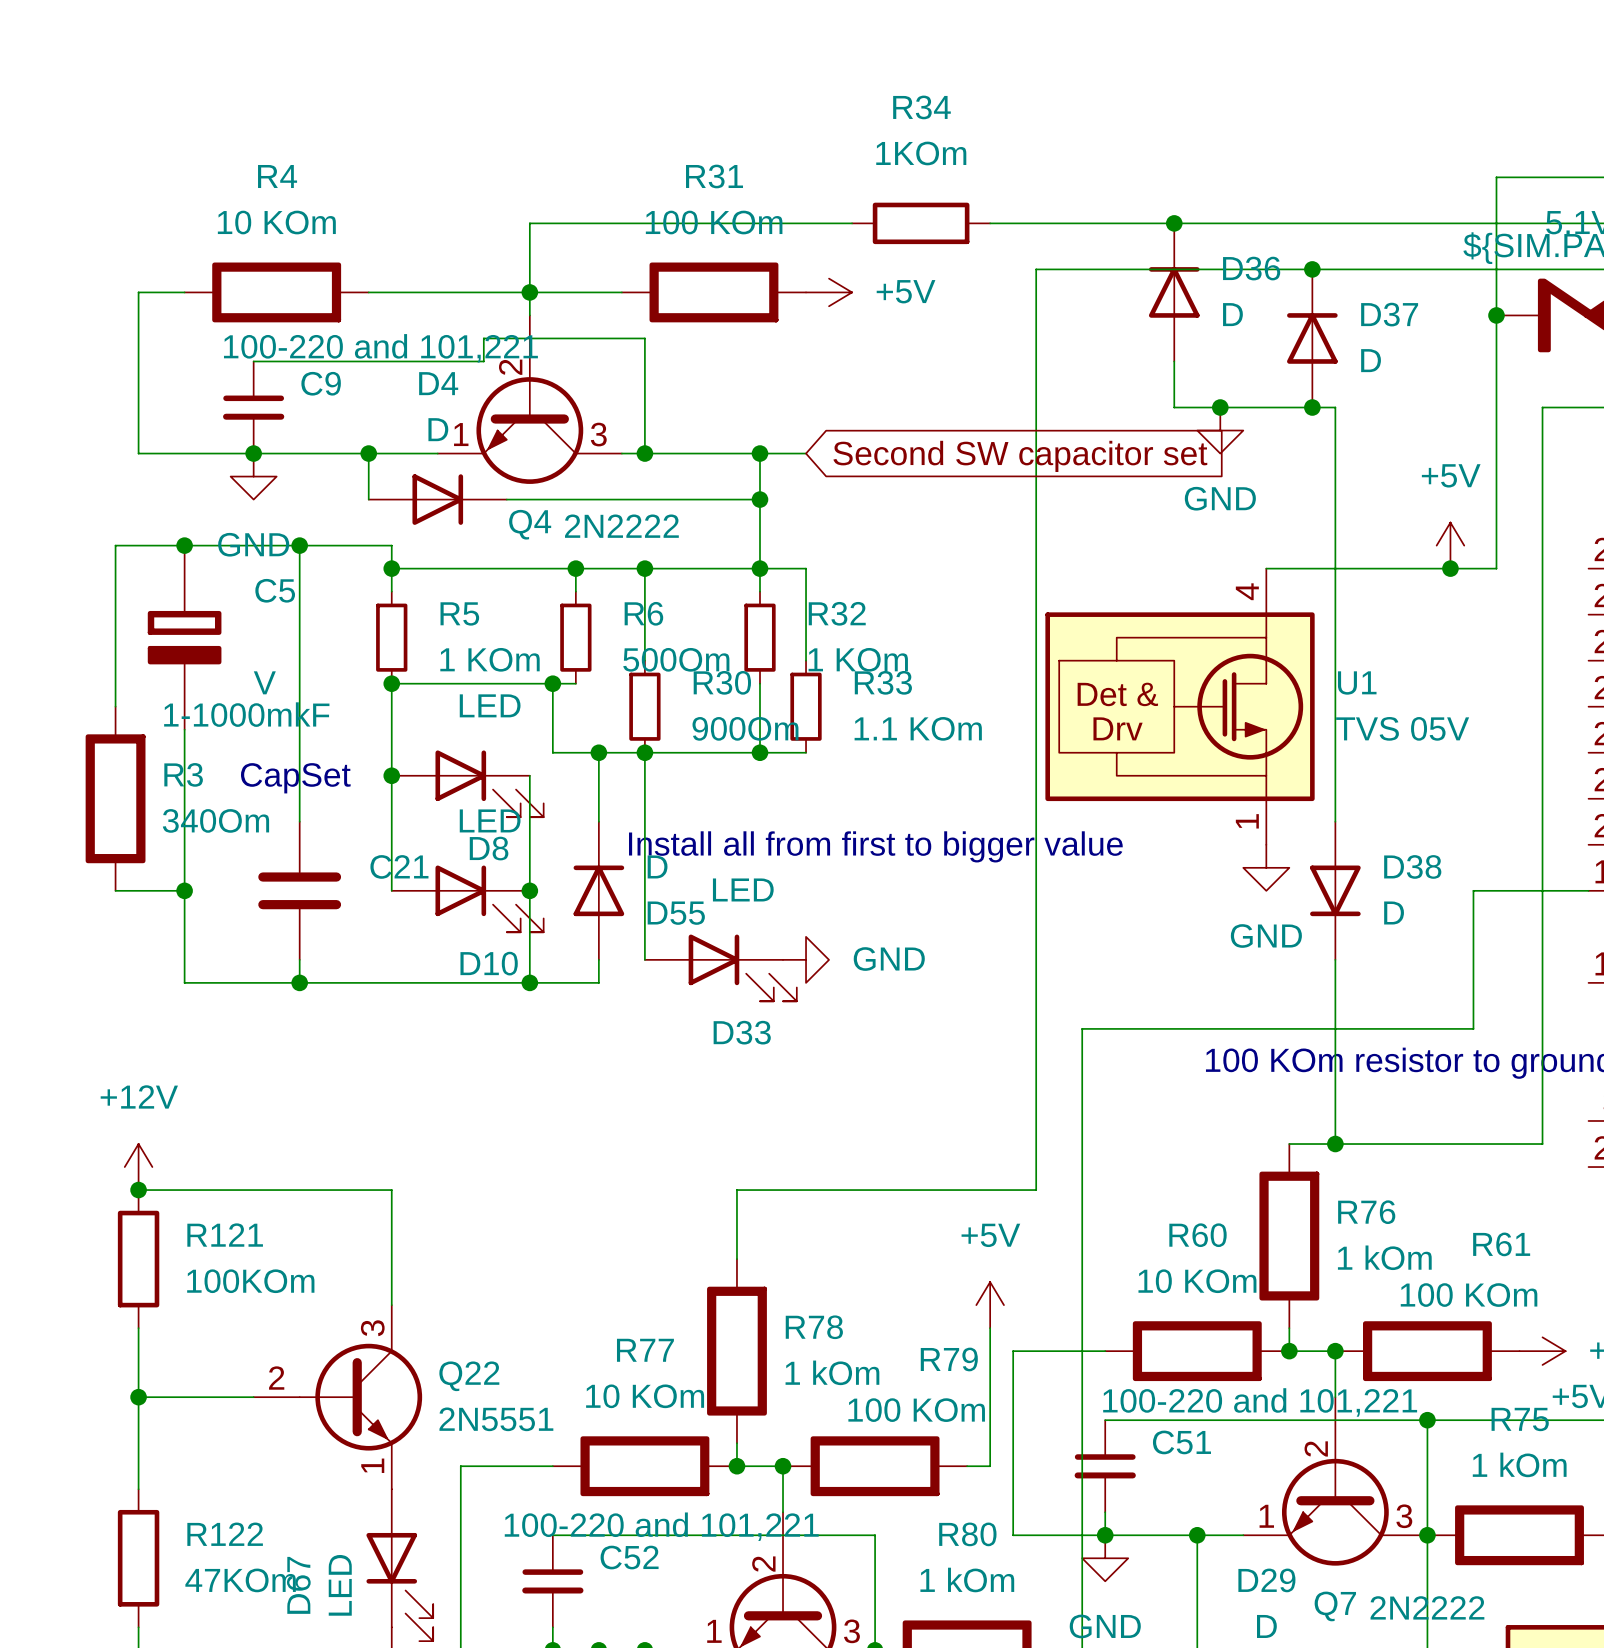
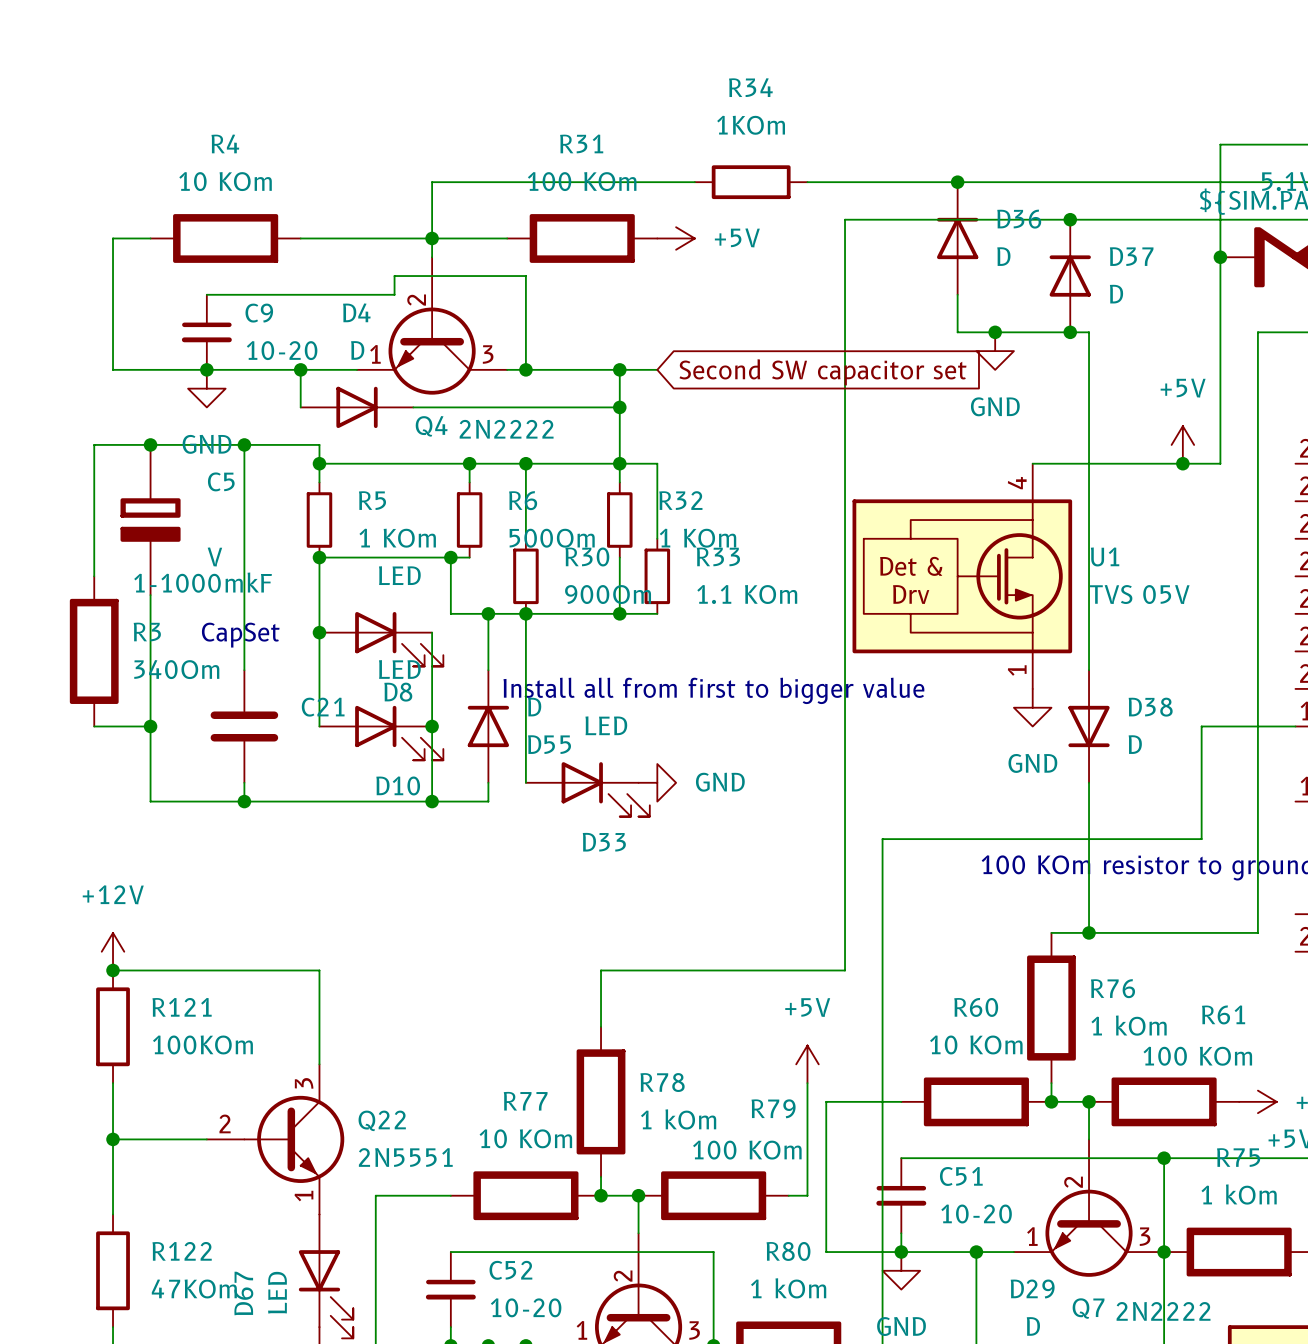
C9 value: 100-220 and 101,221 (380, 348) -> 10-20 (282, 350)
C51 value: 100-220 and 101,221 (1260, 1402) -> 10-20 (976, 1213)
C52 value: 100-220 and 101,221 (661, 1526) -> 10-20 (526, 1307)

